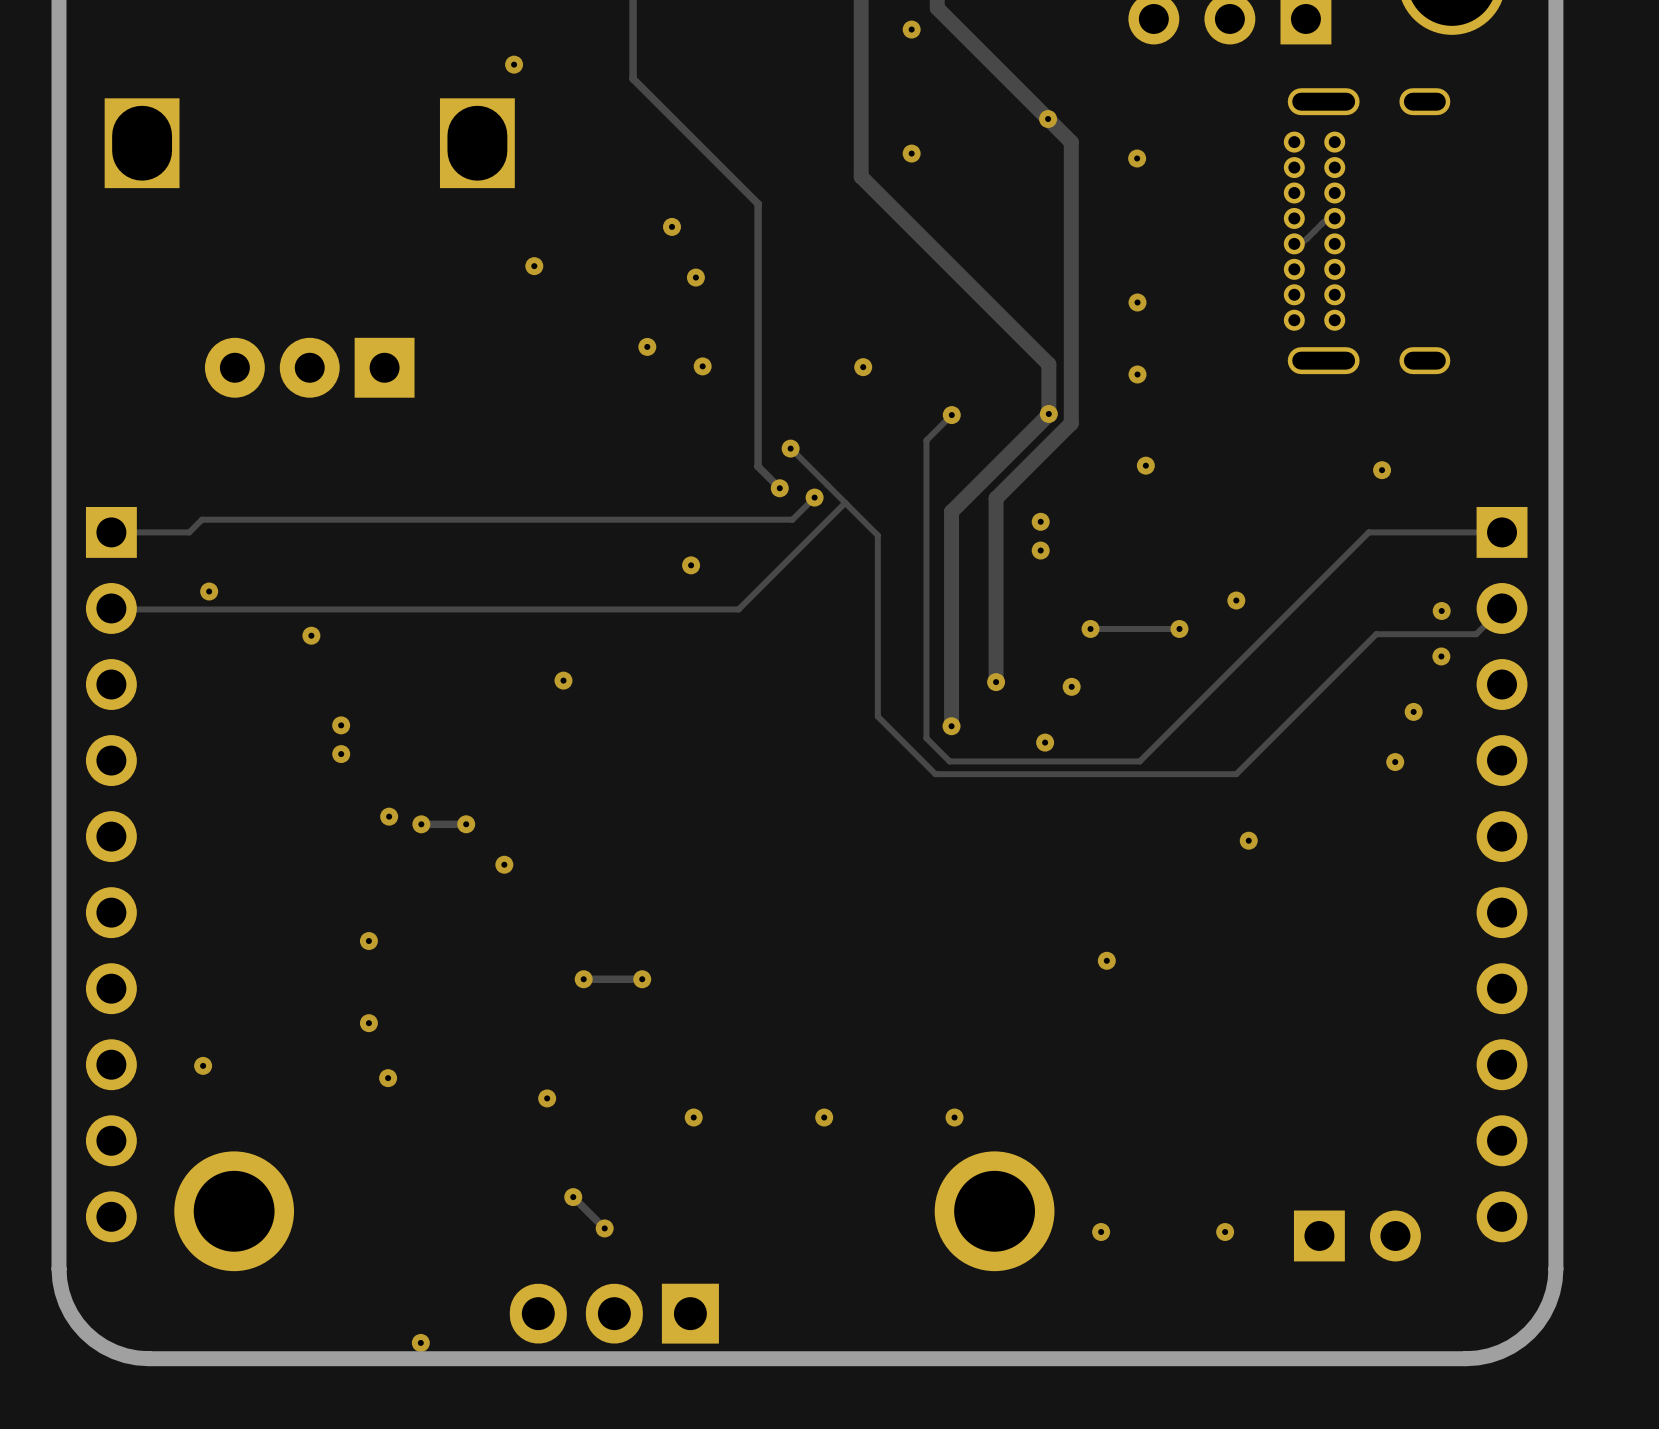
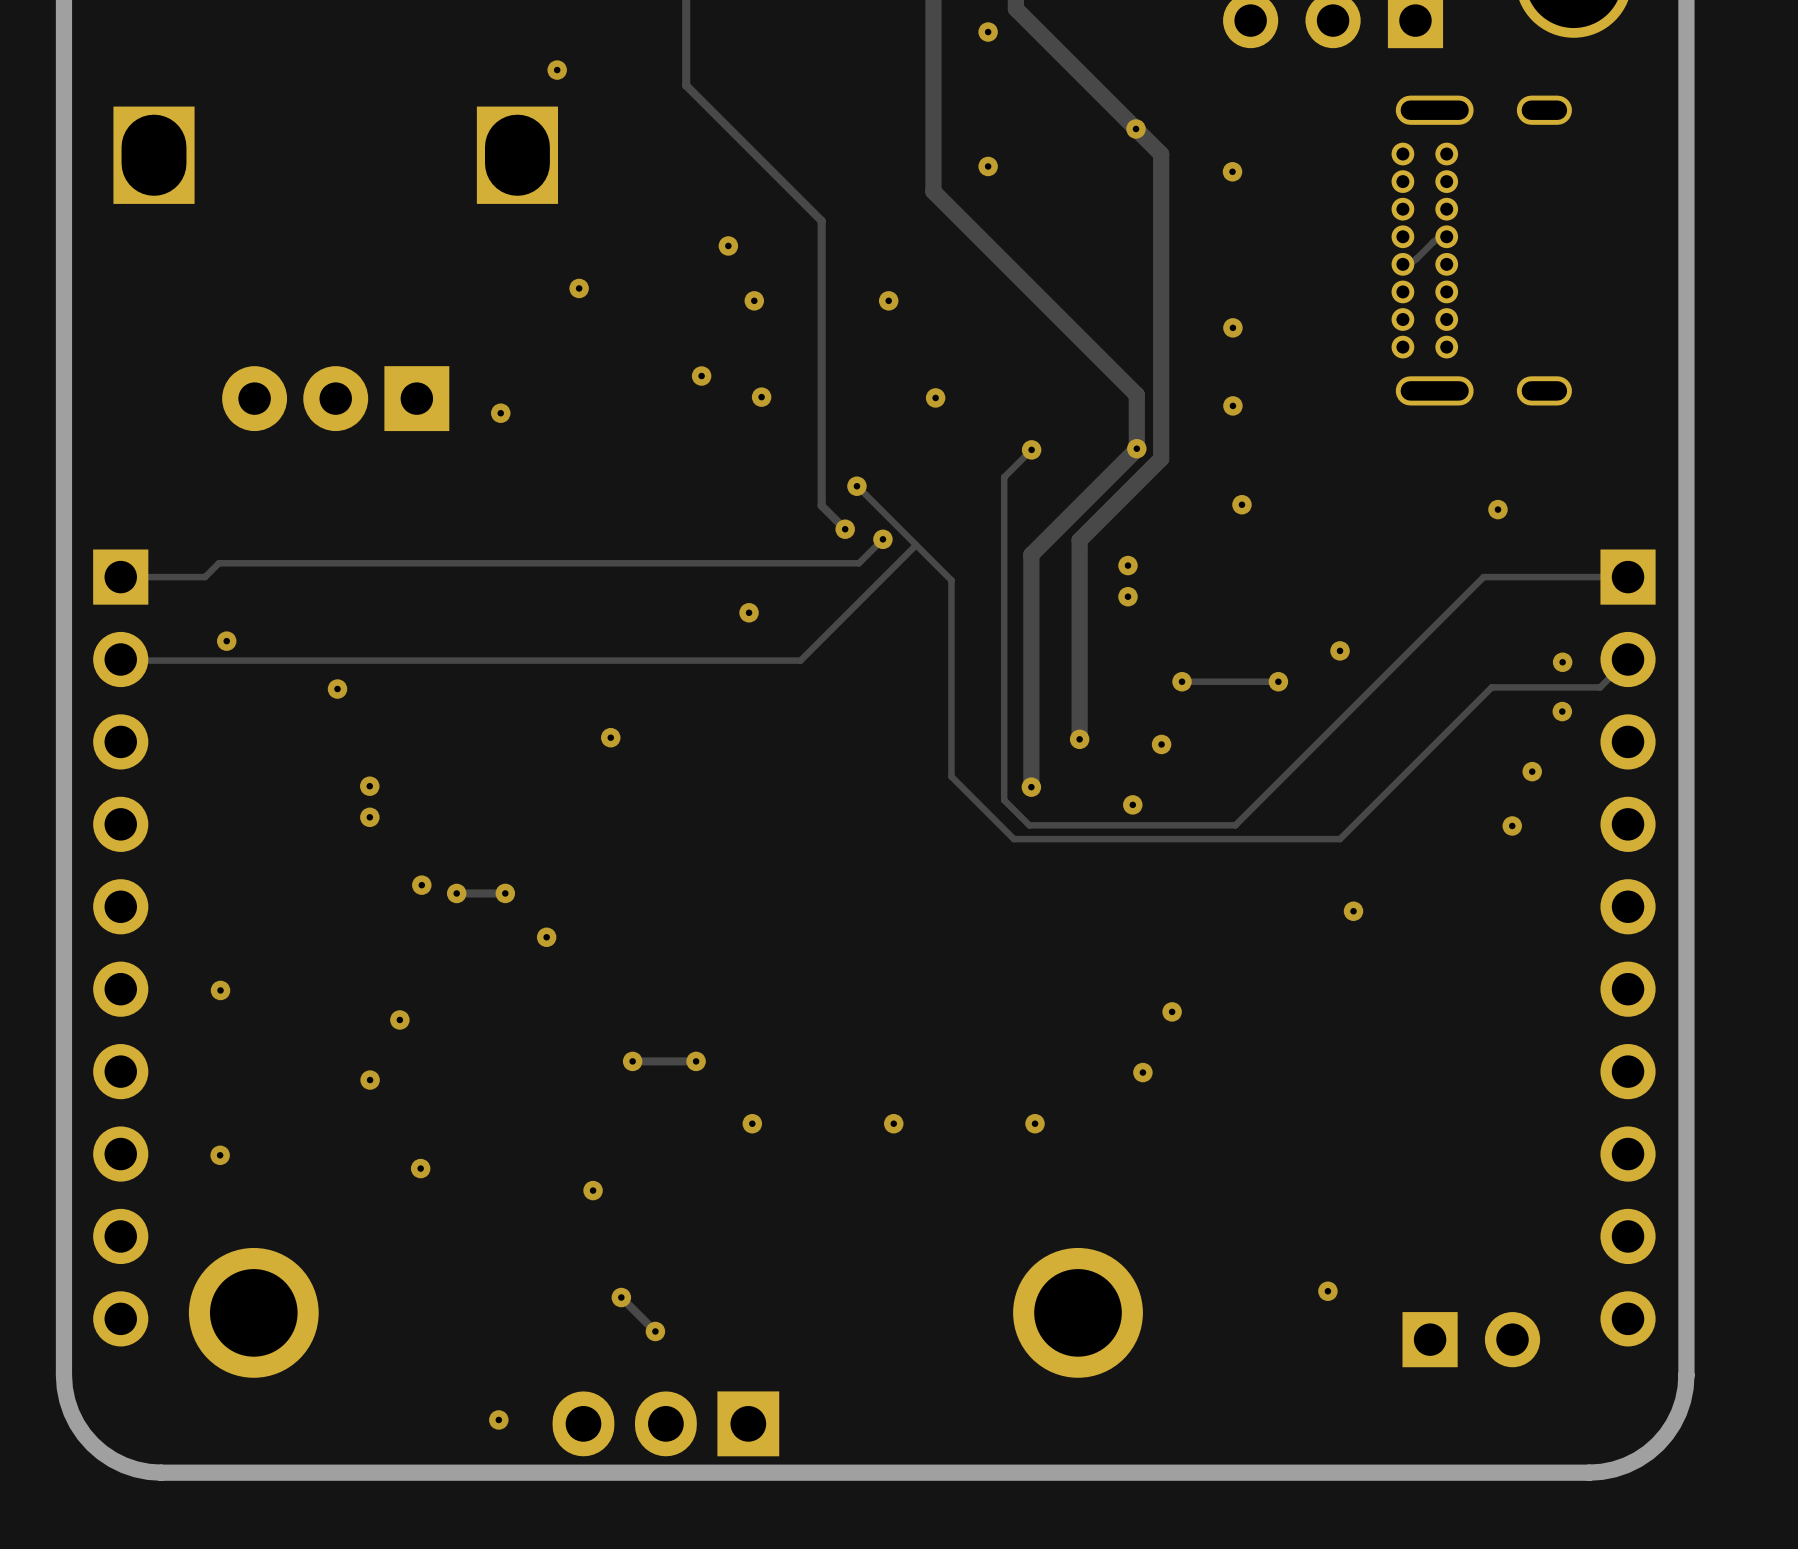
via: none -> (888, 300)
via: none -> (500, 413)
via: none -> (220, 990)
via: none -> (1172, 1011)
via: (1106, 960) -> none
via: none -> (1142, 1072)
via position: (368, 1023) -> (370, 1080)
via: none -> (752, 1123)
via: none -> (893, 1123)
via: none -> (1035, 1123)
via: (693, 1117) -> none
via: (824, 1117) -> none
via: (954, 1117) -> none
via: (1101, 1232) -> none
via position: (1225, 1232) -> (1327, 1291)
via position: (420, 1342) -> (498, 1419)

